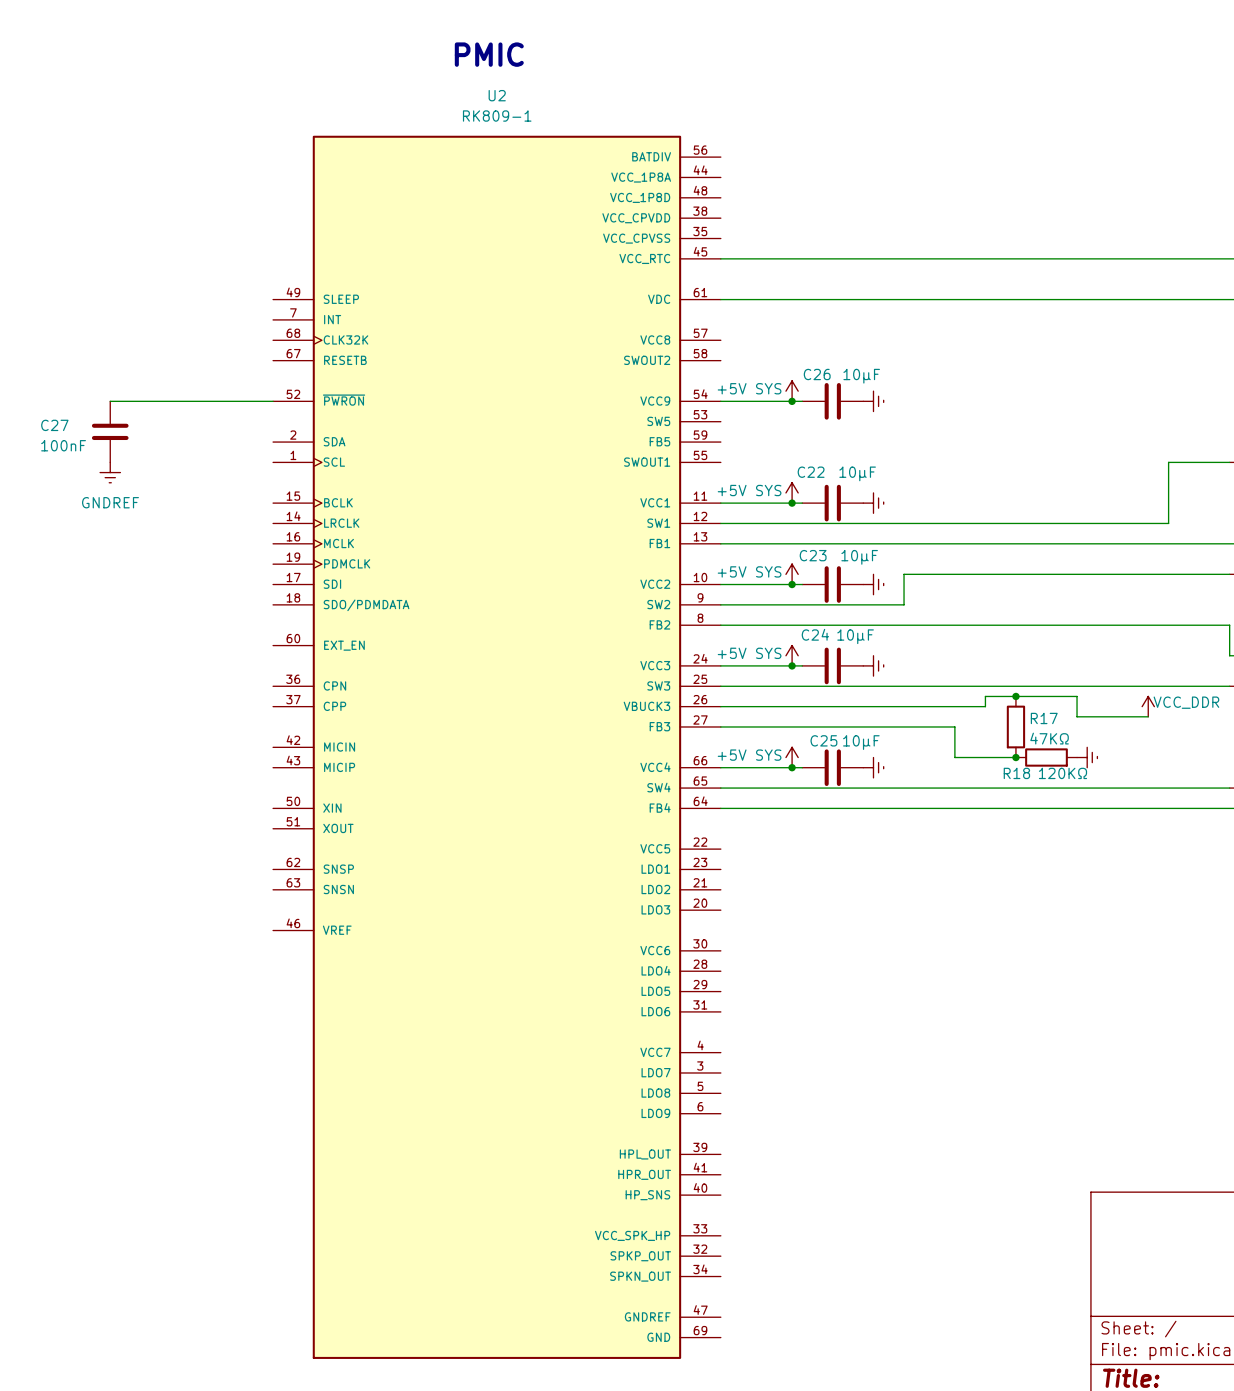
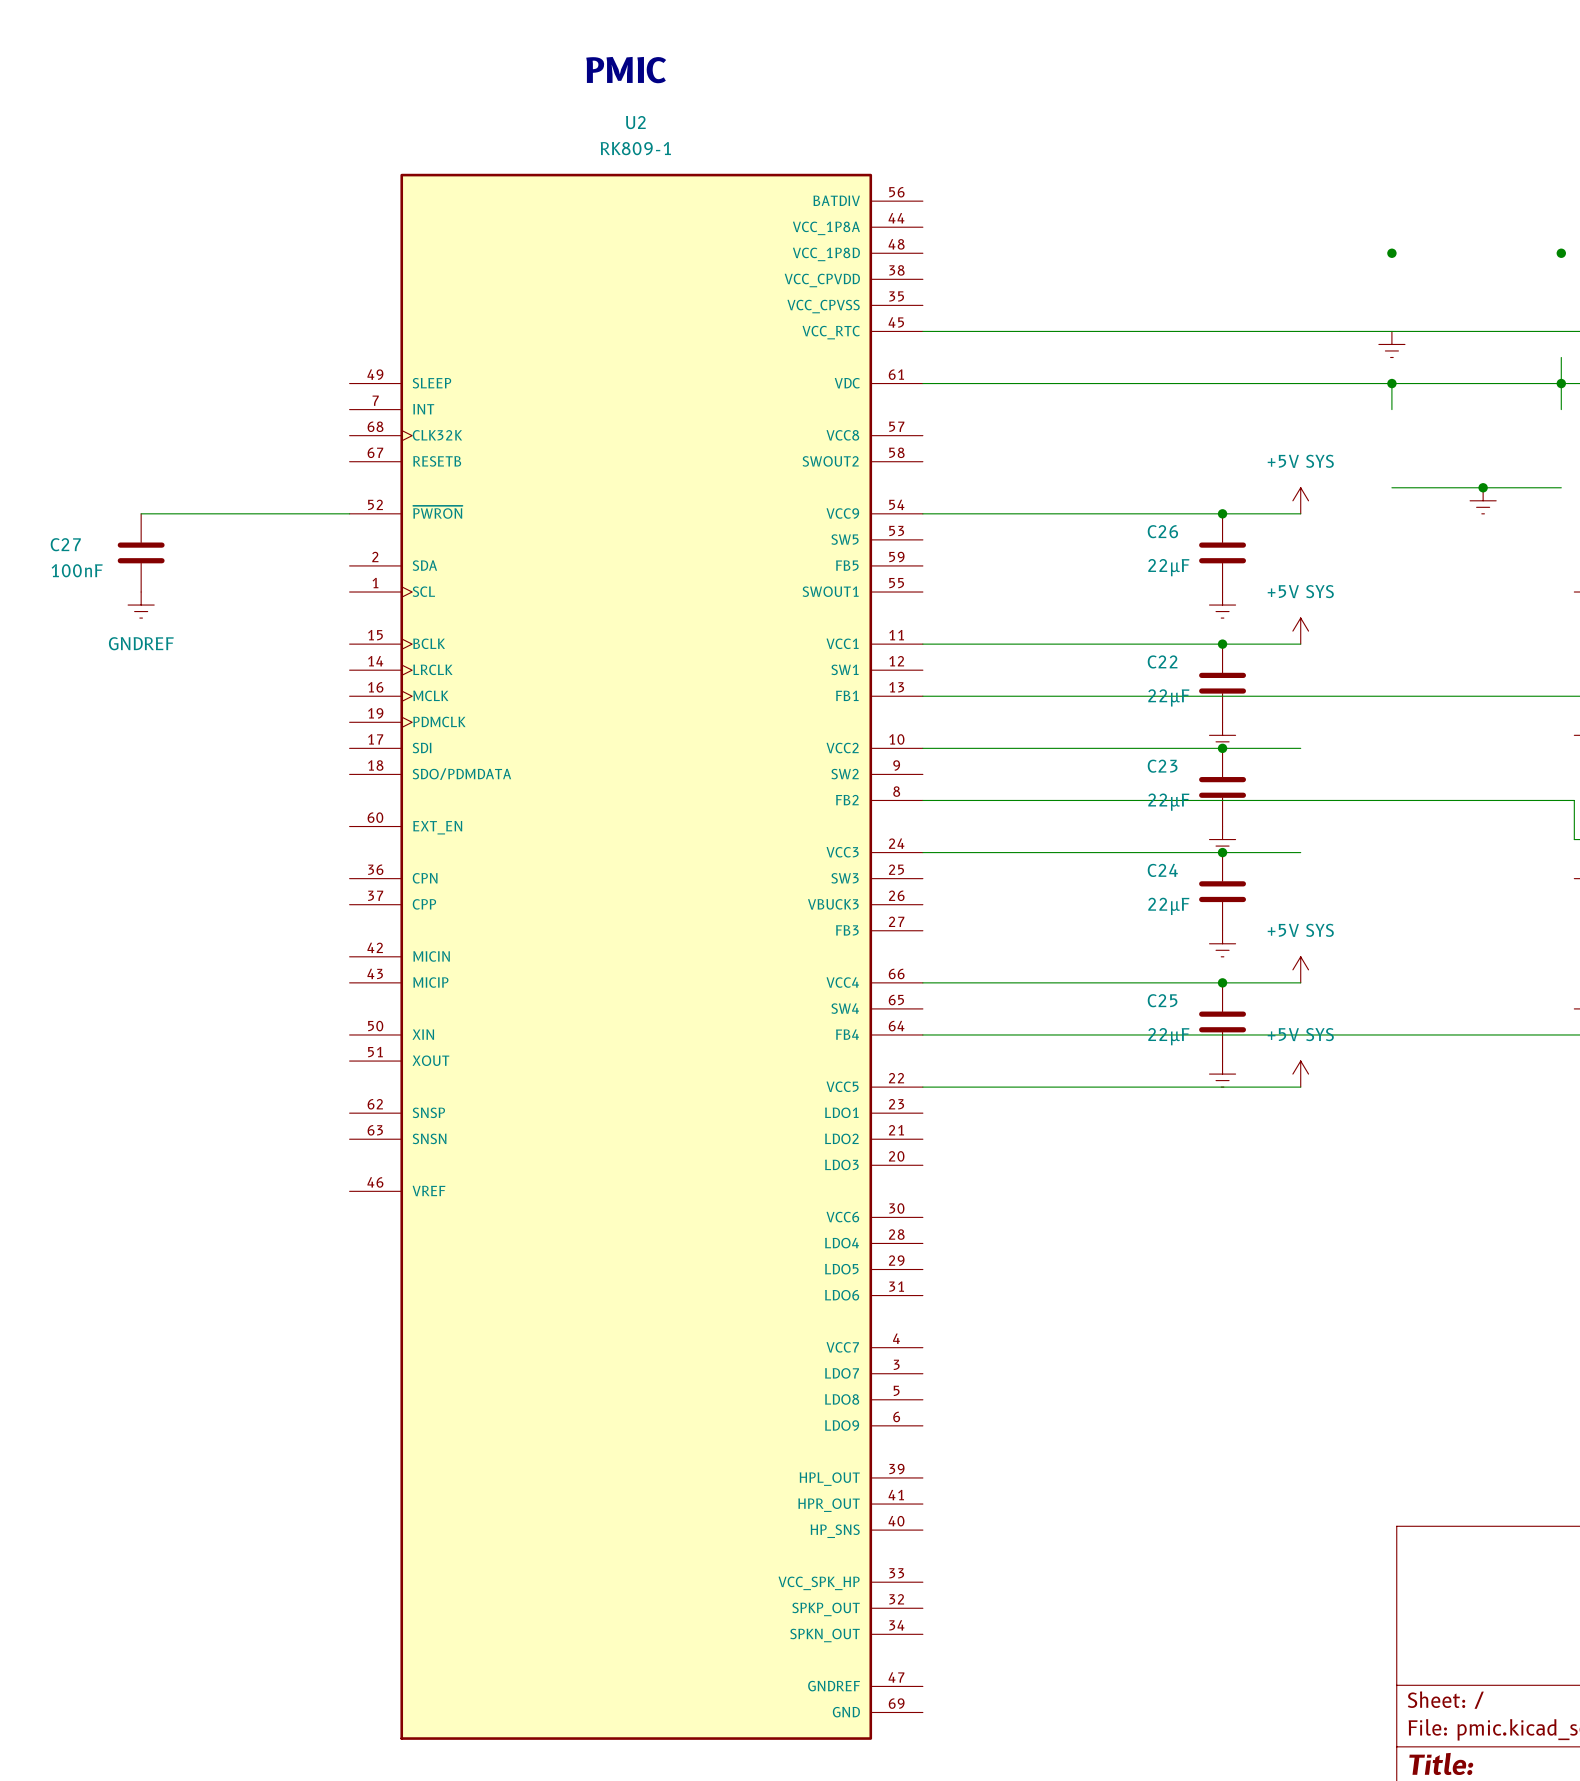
junction: none -> (1391, 253)
junction: none -> (1561, 253)
power symbol: none -> (1391, 344)
wire: none -> (1561, 357) (1561, 409)
wire: none -> (1391, 383) (1391, 409)
junction: none -> (1391, 383)
junction: none -> (1561, 383)
C26 name position: C26 (817, 374) -> C26 (1162, 531)
C26 value: 10µF (861, 376) -> 22µF (1168, 567)
wire: none -> (1391, 487) (1561, 487)
junction: none -> (1483, 487)
power symbol: +5V SYS (792, 391) -> none
power symbol: none -> +5V SYS (1300, 500)
power symbol: none -> (1483, 500)
junction: (792, 401) -> none
wire: none -> (1027, 513) (1300, 513)
C26 rotation: 0° (832, 401) -> 90° clockwise (1222, 552)
C26 position: (832, 401) -> (1222, 552)
power symbol: (873, 401) -> none
junction: none -> (1222, 513)
wire: (1229, 462) (1168, 462) (1168, 523) (720, 523) -> none
C22 name position: C22 (811, 472) -> C22 (1162, 661)
power symbol: none -> (1222, 605)
C22 value: 10µF (857, 473) -> 22µF (1168, 697)
power symbol: +5V SYS (792, 492) -> none
power symbol: none -> +5V SYS (1300, 631)
junction: (792, 503) -> none
wire: none -> (1027, 644) (1300, 644)
C22 rotation: 0° (832, 503) -> 90° clockwise (1222, 683)
C22 position: (832, 503) -> (1222, 683)
power symbol: (873, 503) -> none
junction: none -> (1222, 644)
C23 name position: C23 (813, 555) -> C23 (1162, 766)
C23 value: 10µF (859, 557) -> 22µF (1168, 802)
power symbol: +5V SYS (792, 574) -> none
power symbol: none -> (1222, 735)
wire: (1229, 574) (904, 574) (904, 604) (720, 604) -> none
junction: (792, 584) -> none
wire: none -> (1027, 748) (1300, 748)
C23 rotation: 0° (832, 584) -> 90° clockwise (1222, 787)
C23 position: (832, 584) -> (1222, 787)
power symbol: (873, 584) -> none
junction: none -> (1222, 748)
C24 name position: C24 (815, 634) -> C24 (1162, 870)
C24 value: 10µF (855, 636) -> 22µF (1168, 906)
power symbol: +5V SYS (792, 655) -> none
power symbol: none -> (1222, 839)
junction: (792, 665) -> none
wire: none -> (1027, 852) (1300, 852)
C24 rotation: 0° (832, 665) -> 90° clockwise (1222, 891)
C24 position: (832, 665) -> (1222, 891)
power symbol: (873, 665) -> none
junction: none -> (1222, 852)
wire: (720, 686) (1229, 686) -> none
junction: (1015, 696) -> none
wire: (720, 706) (985, 706) (985, 696) (1077, 696) (1077, 716) (1148, 716) -> none
power symbol: VCC_DDR (1148, 706) -> none
wire: (720, 726) (954, 726) (954, 757) (1015, 757) -> none
R17: 47KΩ (1015, 726) -> none
power symbol: none -> (1222, 943)
C25 name position: C25 (823, 740) -> C25 (1162, 1000)
C25 value: 10µF (861, 742) -> 22µF (1168, 1036)
power symbol: +5V SYS (792, 757) -> none
junction: (1015, 757) -> none
power symbol: none -> +5V SYS (1300, 969)
R18: 120KΩ (1046, 757) -> none
power symbol: (1087, 757) -> none
junction: (792, 767) -> none
wire: none -> (1027, 982) (1300, 982)
C25 rotation: 0° (832, 767) -> 90° clockwise (1222, 1021)
C25 position: (832, 767) -> (1222, 1021)
power symbol: (873, 767) -> none
junction: none -> (1222, 982)
wire: (720, 788) (1229, 788) -> none
power symbol: none -> (1222, 1074)
power symbol: none -> +5V SYS (1300, 1074)
wire: none -> (922, 1087) (1300, 1087)

